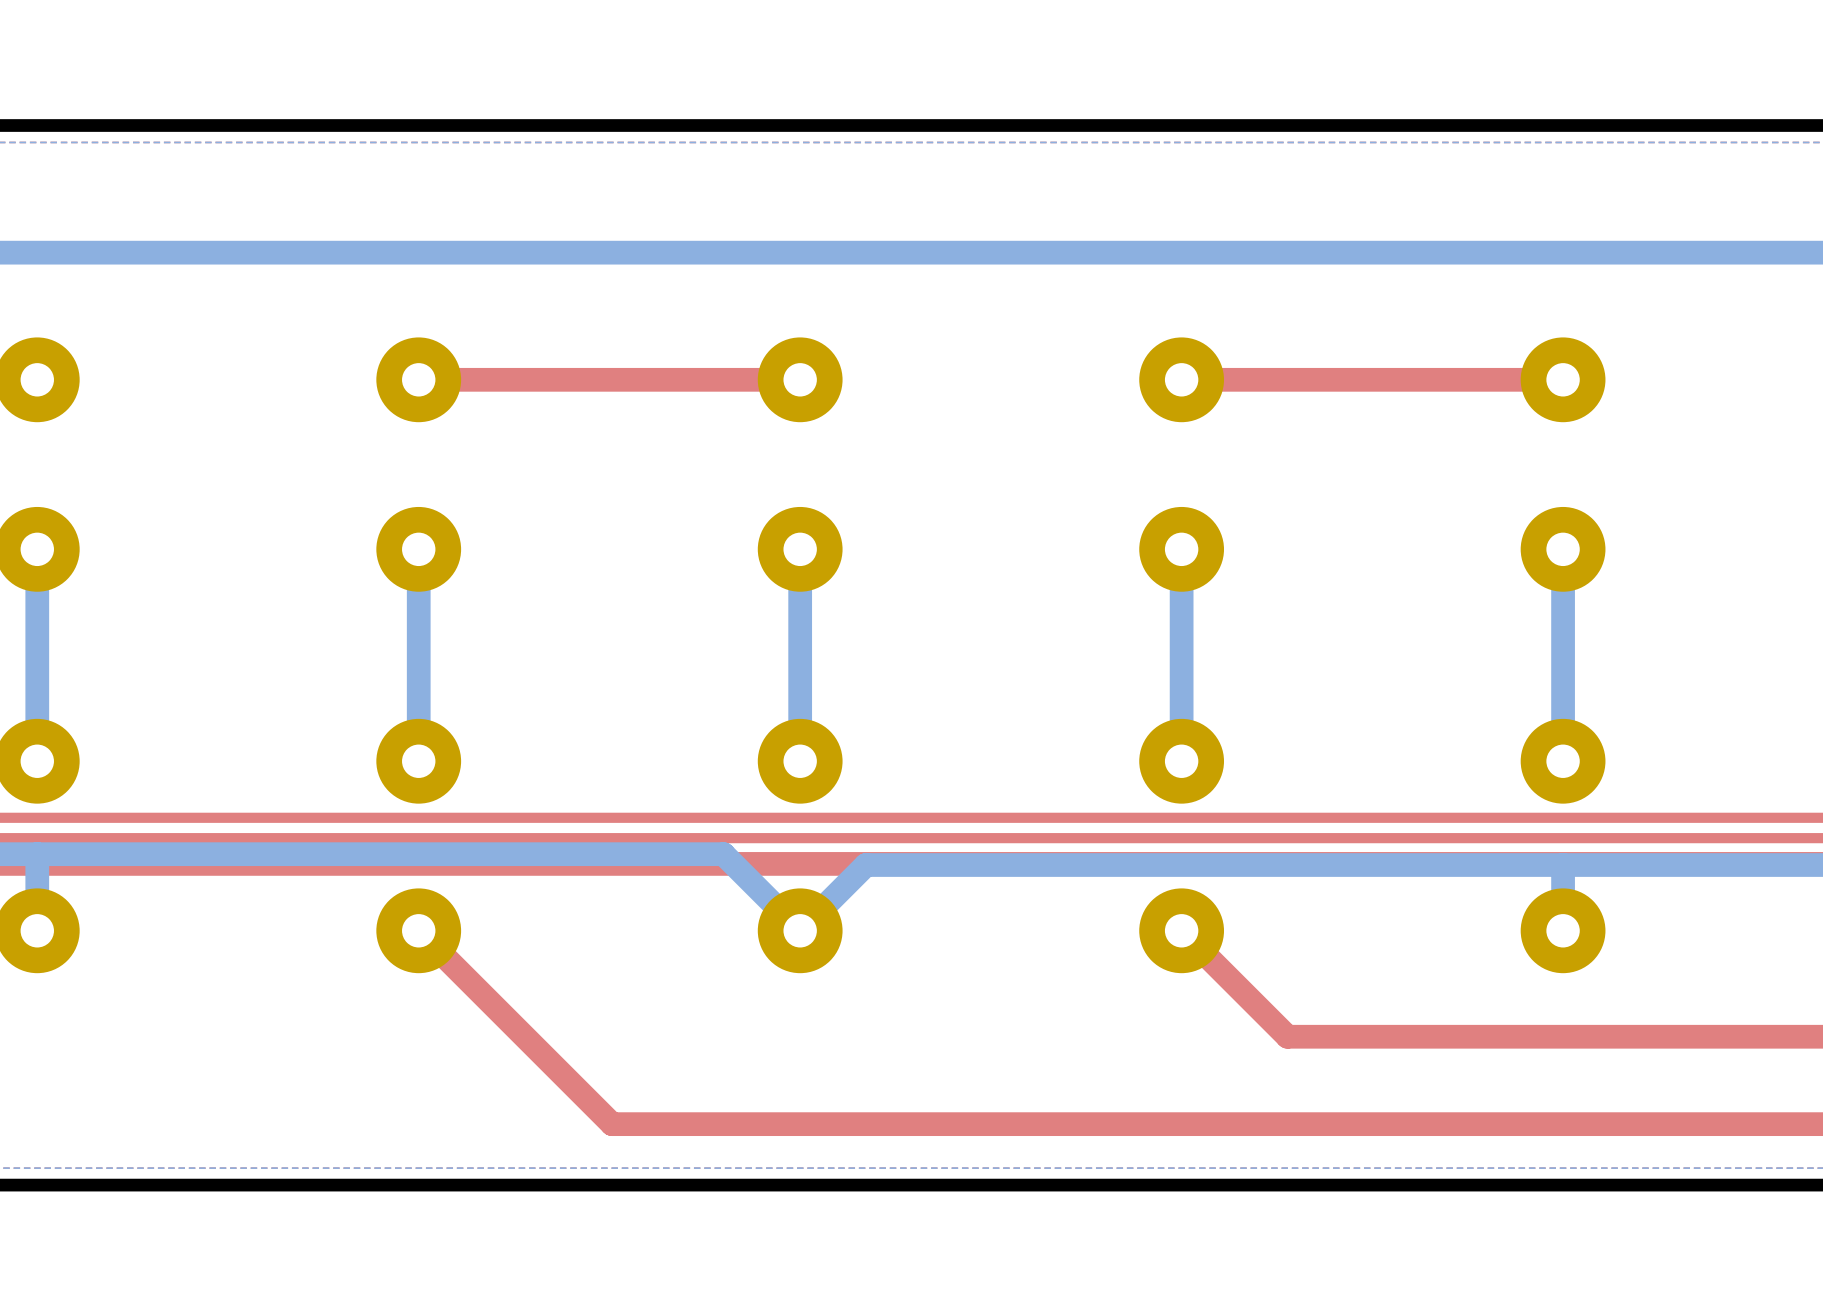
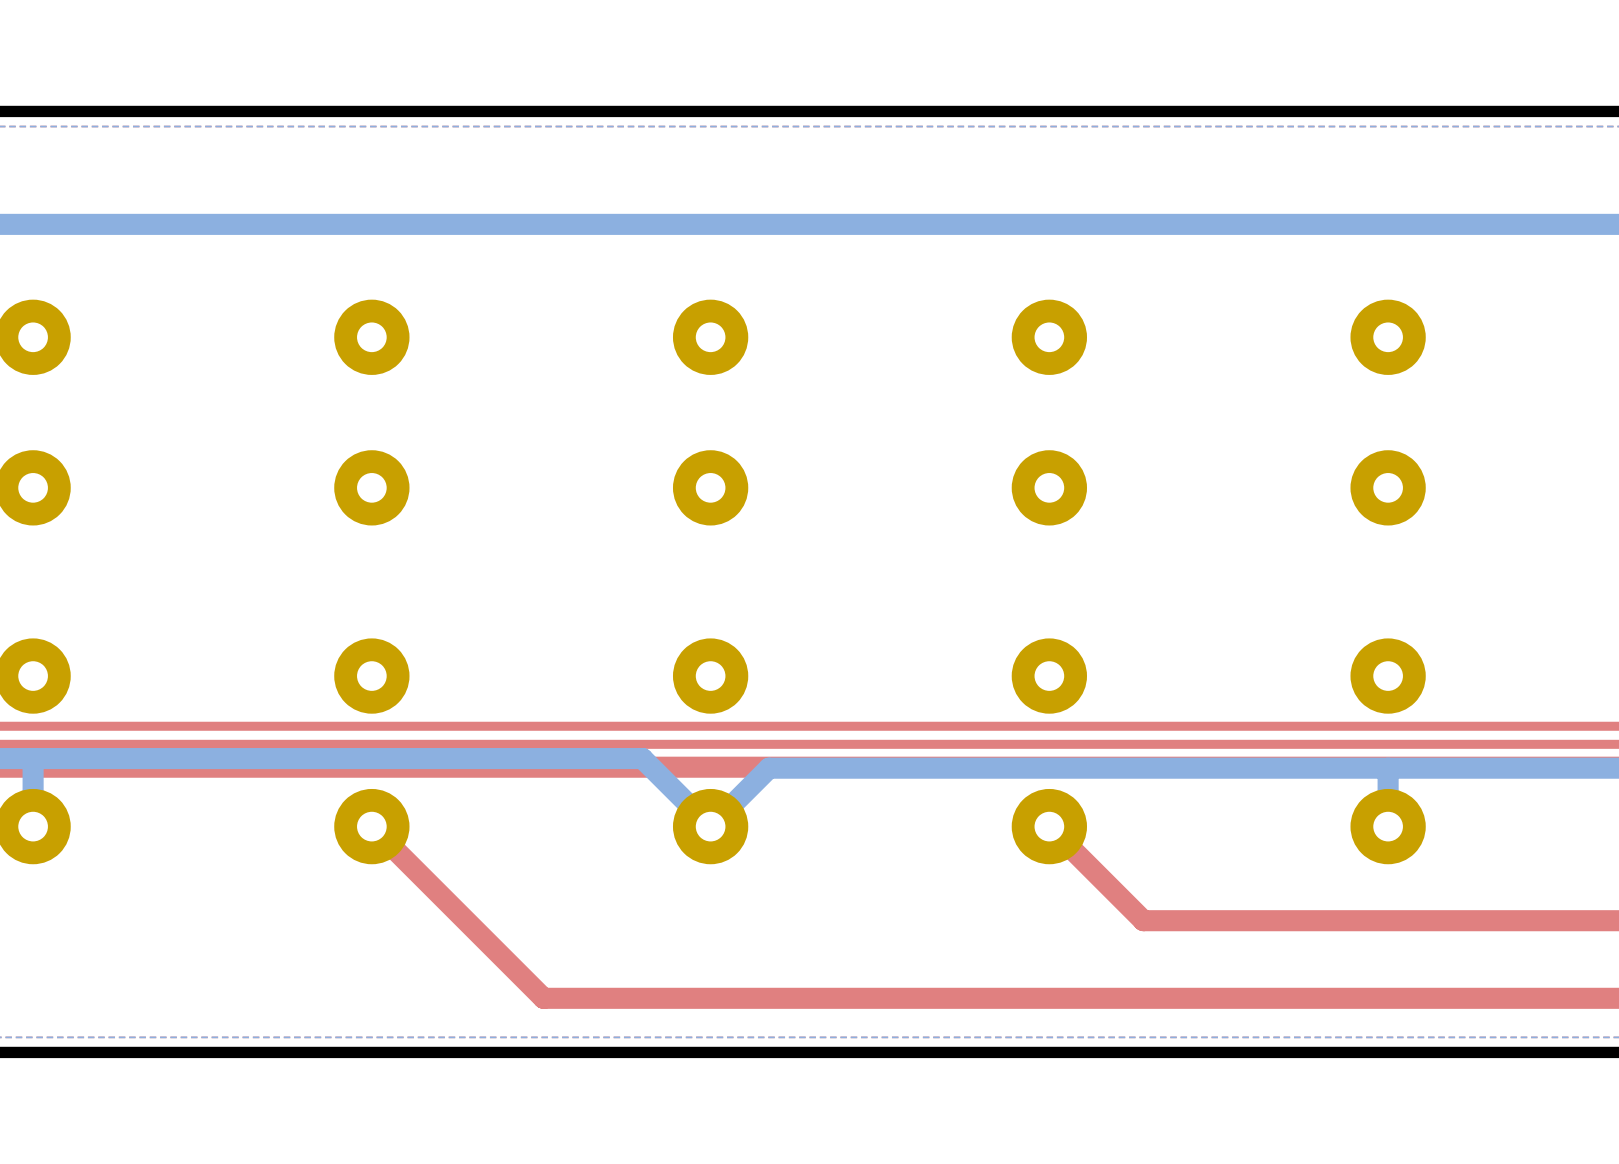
top track: (800, 379) (418, 379) -> none
top track: (1563, 379) (1181, 379) -> none
bottom track: (37, 549) (37, 761) -> none
bottom track: (418, 549) (418, 761) -> none
bottom track: (800, 549) (800, 761) -> none
bottom track: (1181, 549) (1181, 761) -> none
bottom track: (1563, 549) (1563, 761) -> none

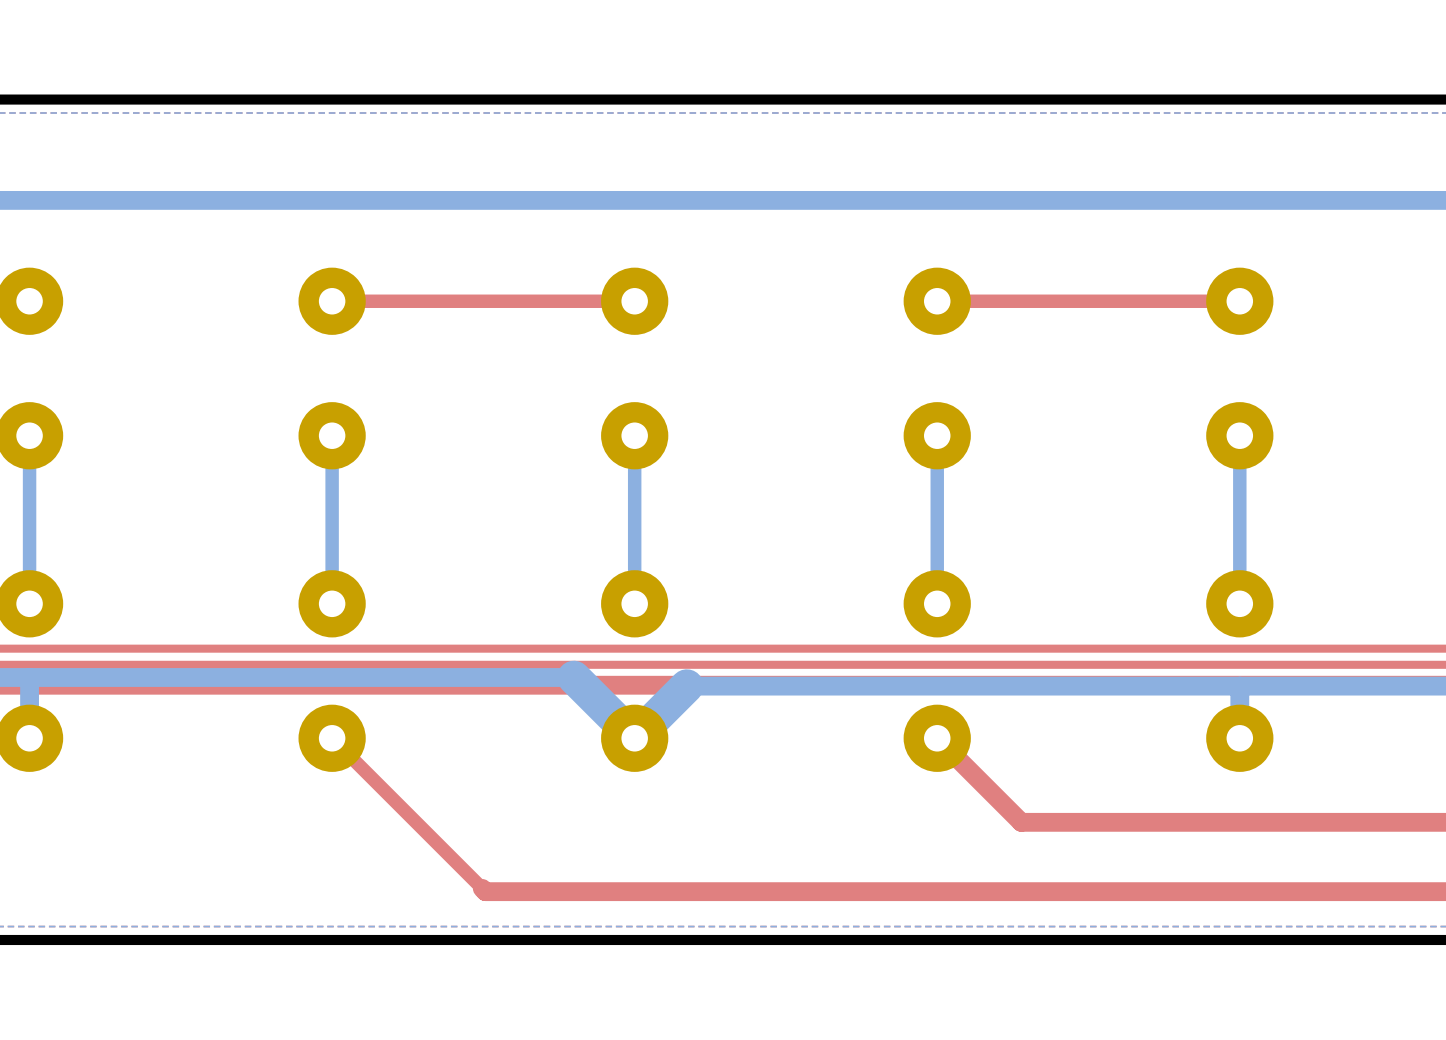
top track: none -> (634, 301) (332, 301)
top track: none -> (1239, 301) (937, 301)
bottom track: none -> (29, 435) (29, 603)
bottom track: none -> (332, 435) (332, 603)
bottom track: none -> (634, 435) (634, 603)
bottom track: none -> (937, 435) (937, 603)
bottom track: none -> (1239, 435) (1239, 603)
bottom track width: thin (642, 758) (710, 826) (769, 768) -> thick (573, 677) (634, 738) (686, 686)
top track width: thick (371, 826) (539, 994) -> thin (332, 738) (482, 888)

